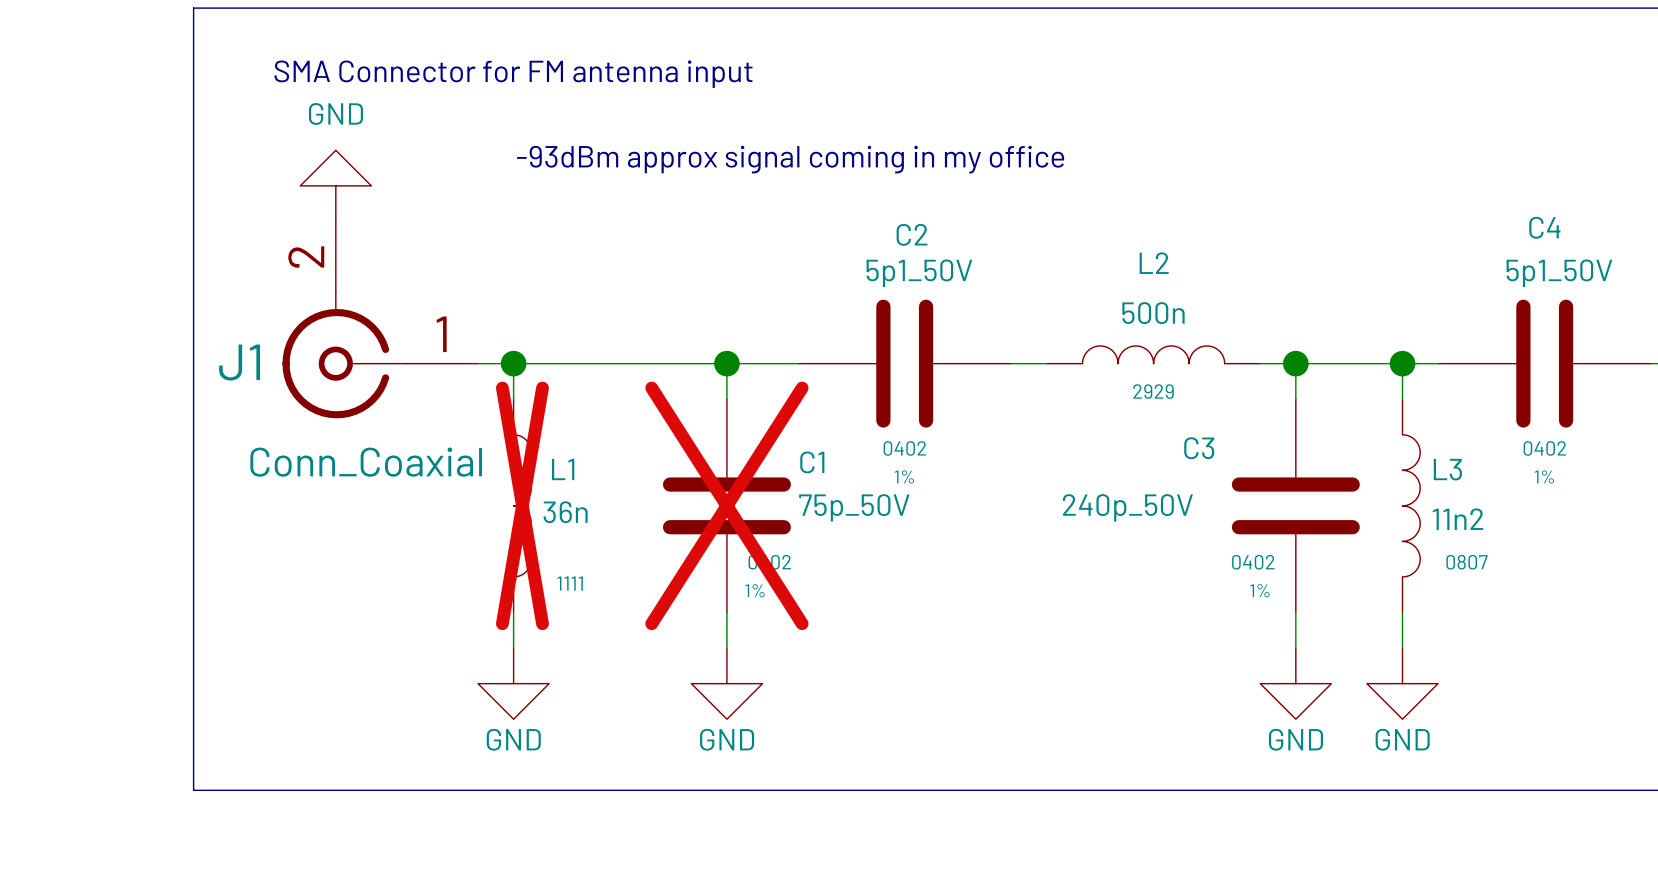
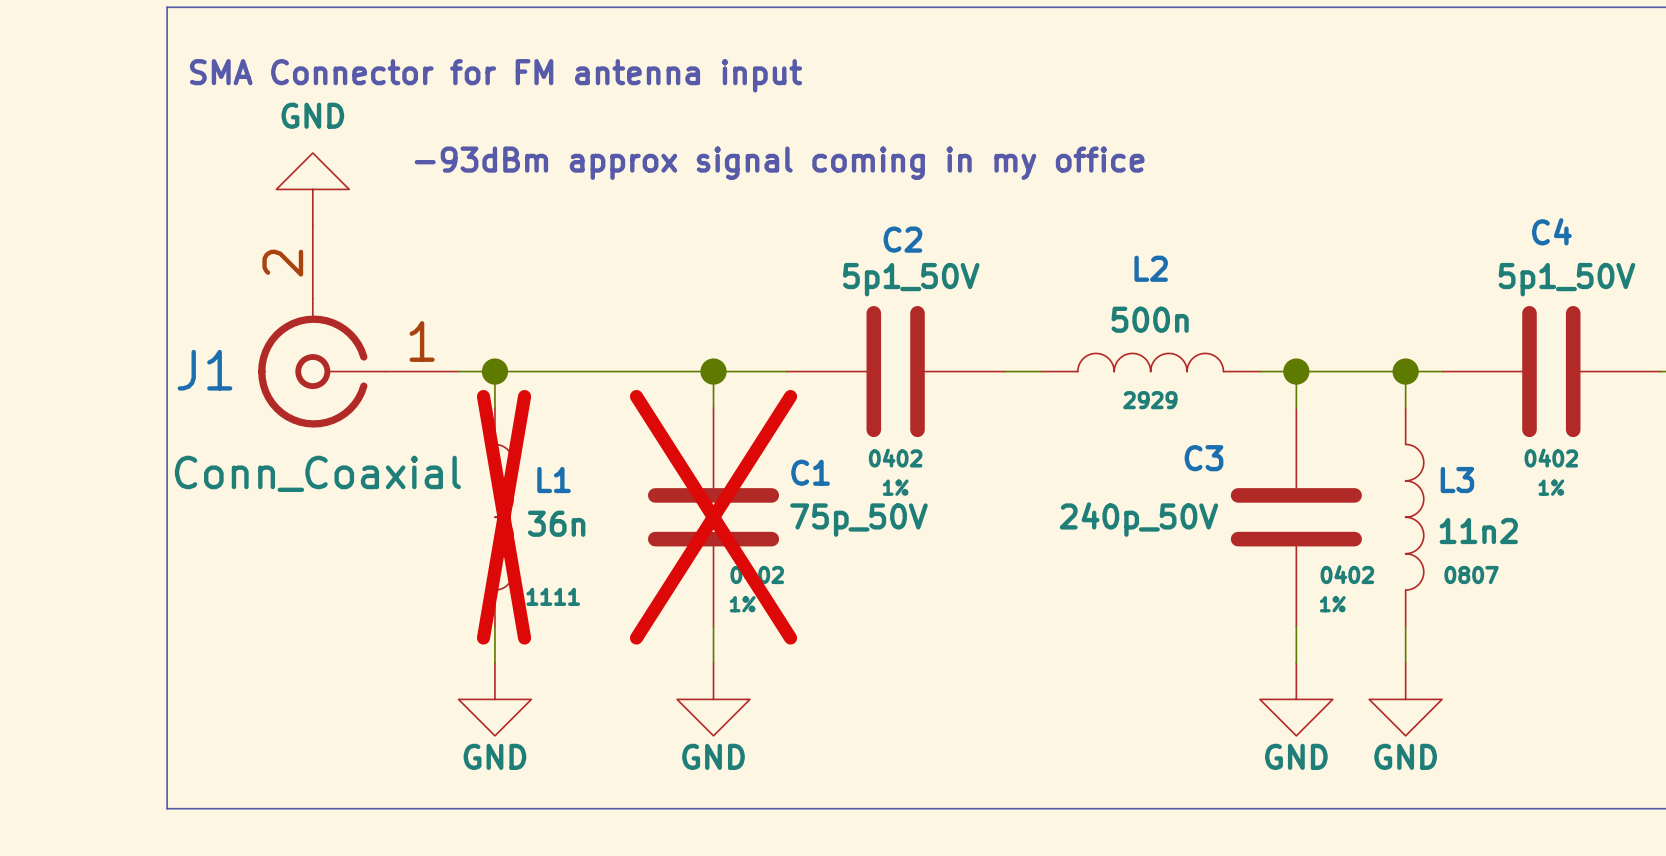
C3 text position: 0402 (1253, 562) -> 0402 (1347, 574)
C3 text position: 1% (1259, 590) -> 1% (1332, 604)

